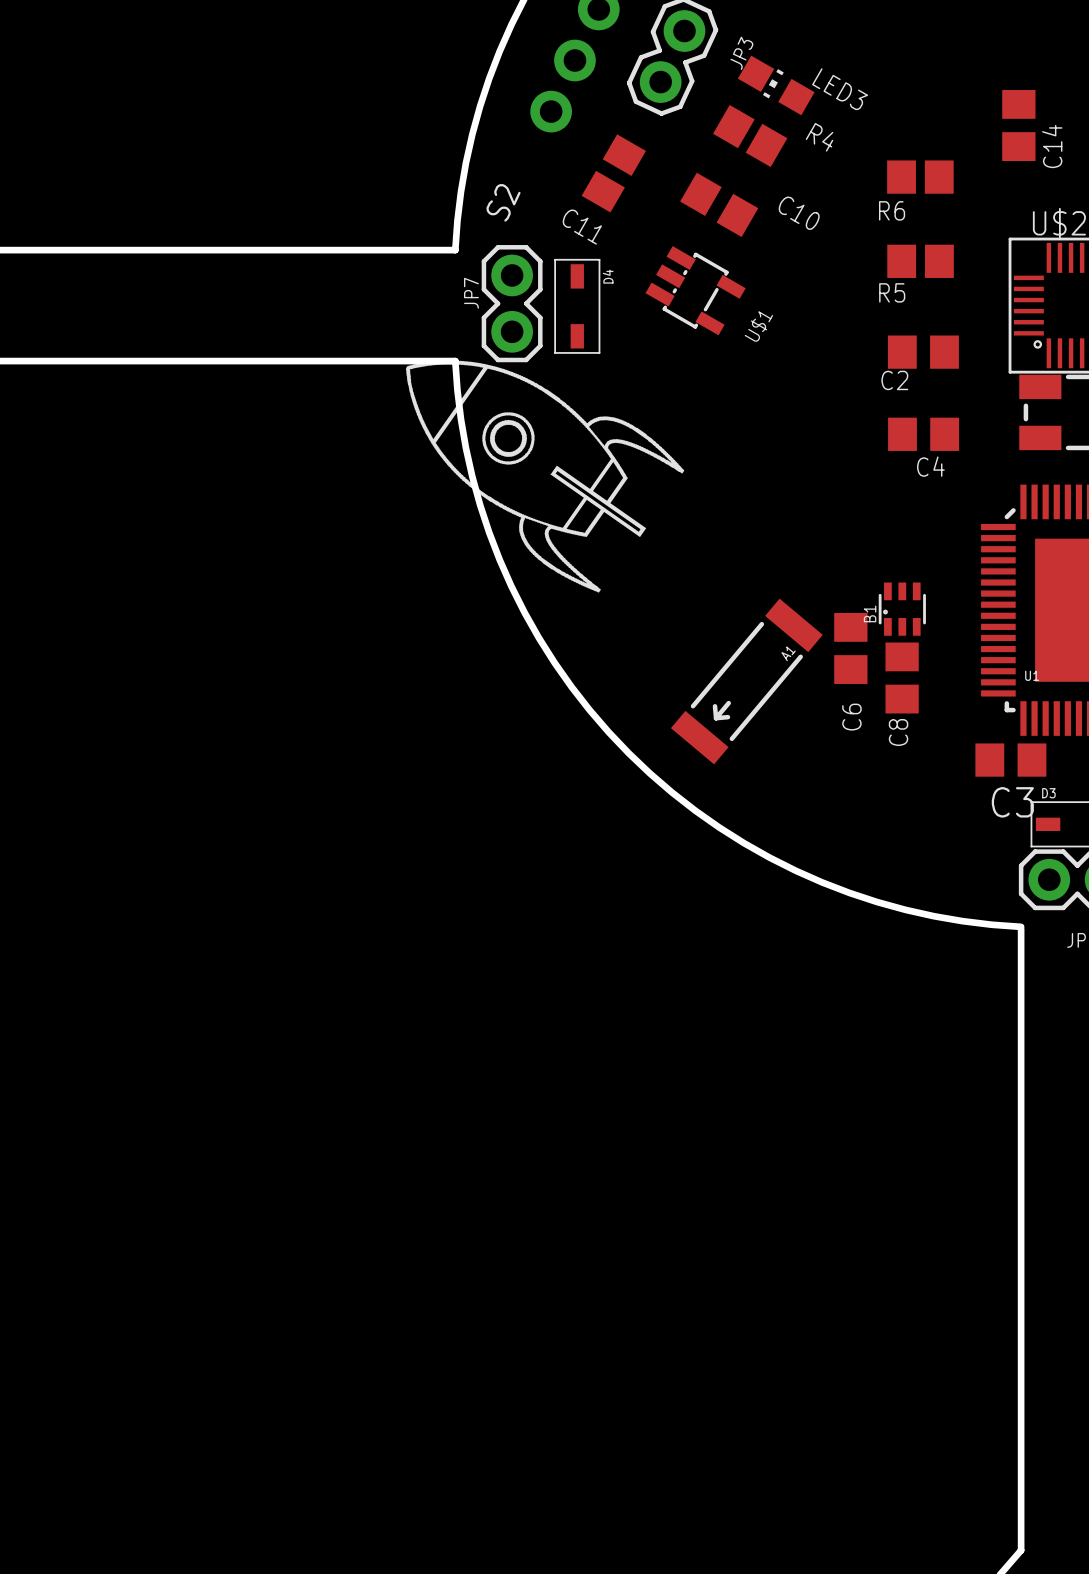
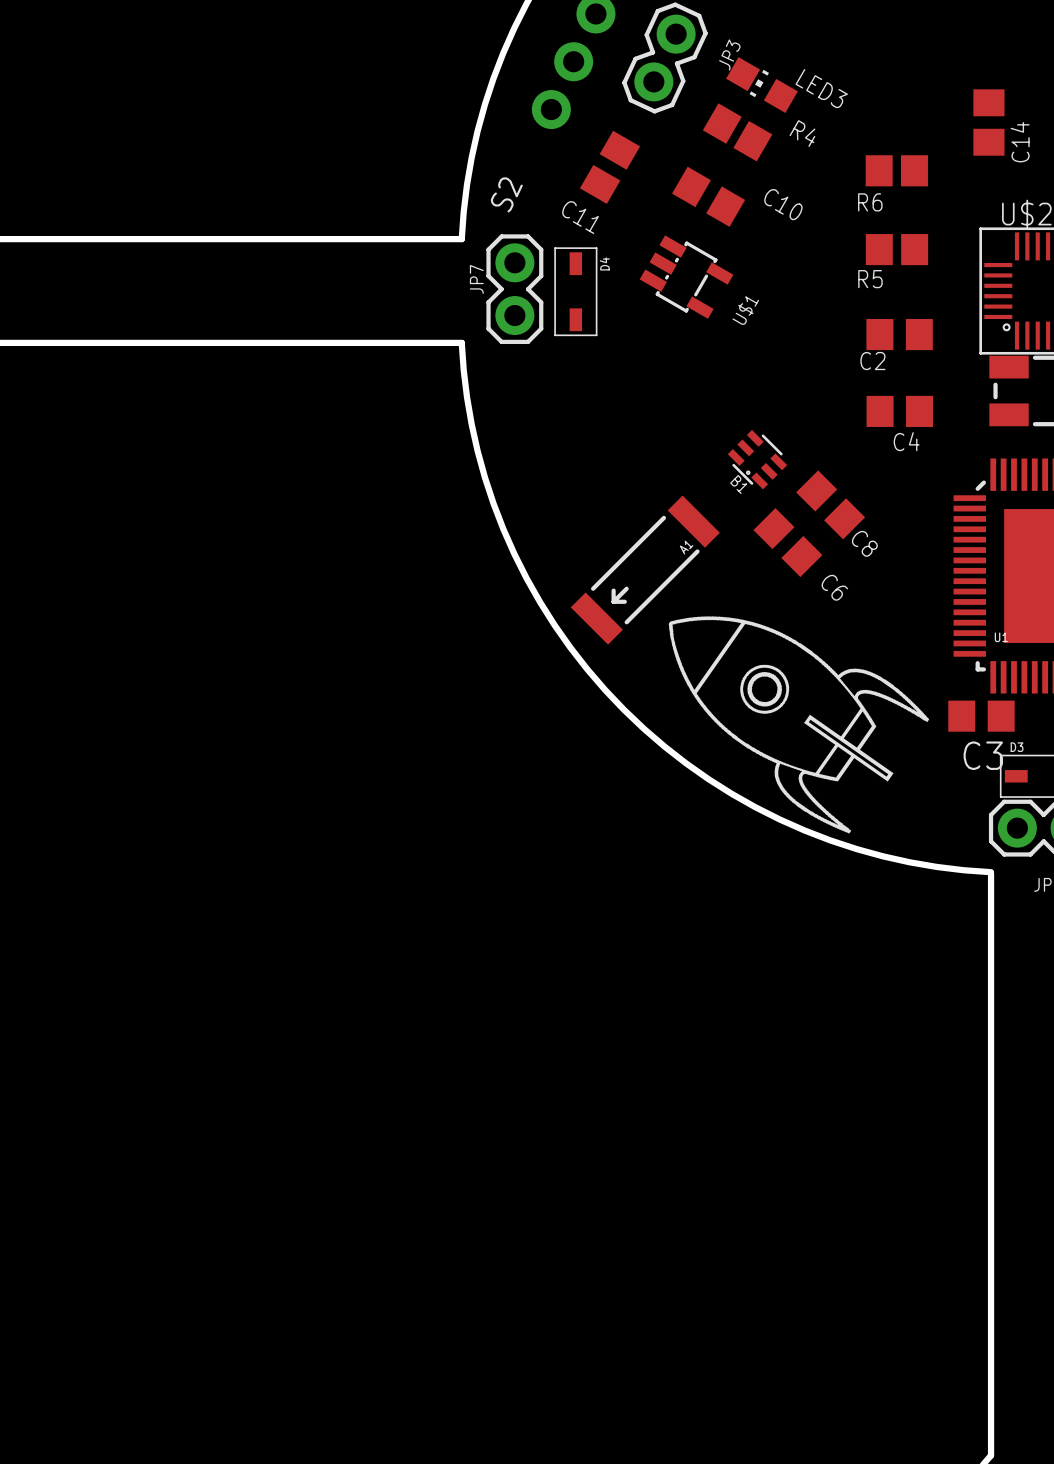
drawing position: (545, 476) -> (798, 724)
B1 rotation: 0° (902, 609) -> 45° counterclockwise (757, 459)
B1 position: (902, 609) -> (757, 459)
C6 rotation: 0° (850, 648) -> 45° counterclockwise (787, 542)
C6 position: (850, 648) -> (787, 542)
C8 rotation: 0° (902, 677) -> 45° counterclockwise (830, 504)
C8 position: (902, 677) -> (830, 504)
A1 rotation: 0° (746, 681) -> 5° clockwise (645, 570)
A1 position: (746, 681) -> (645, 570)

